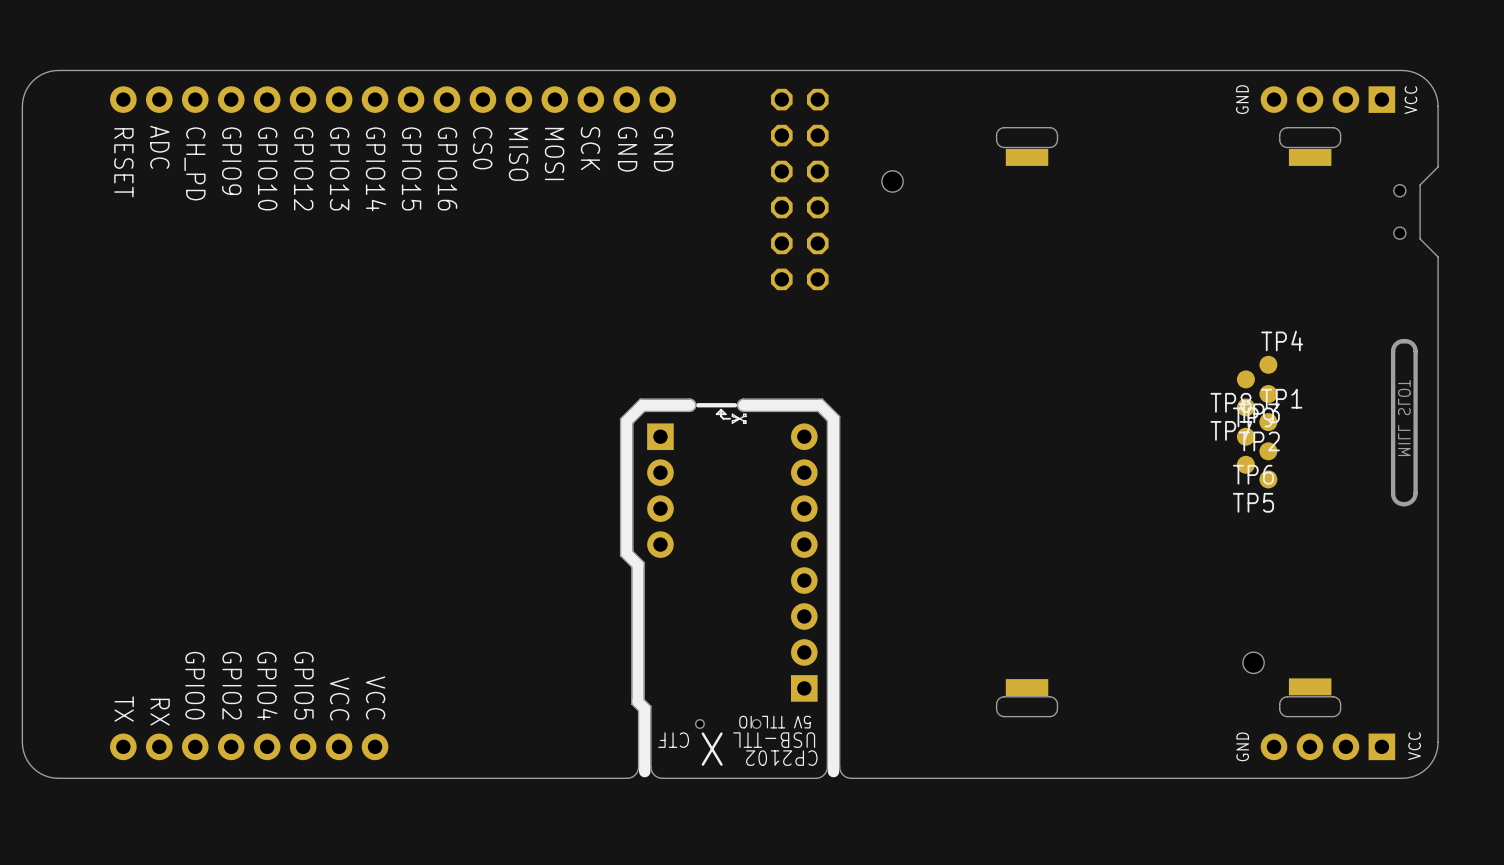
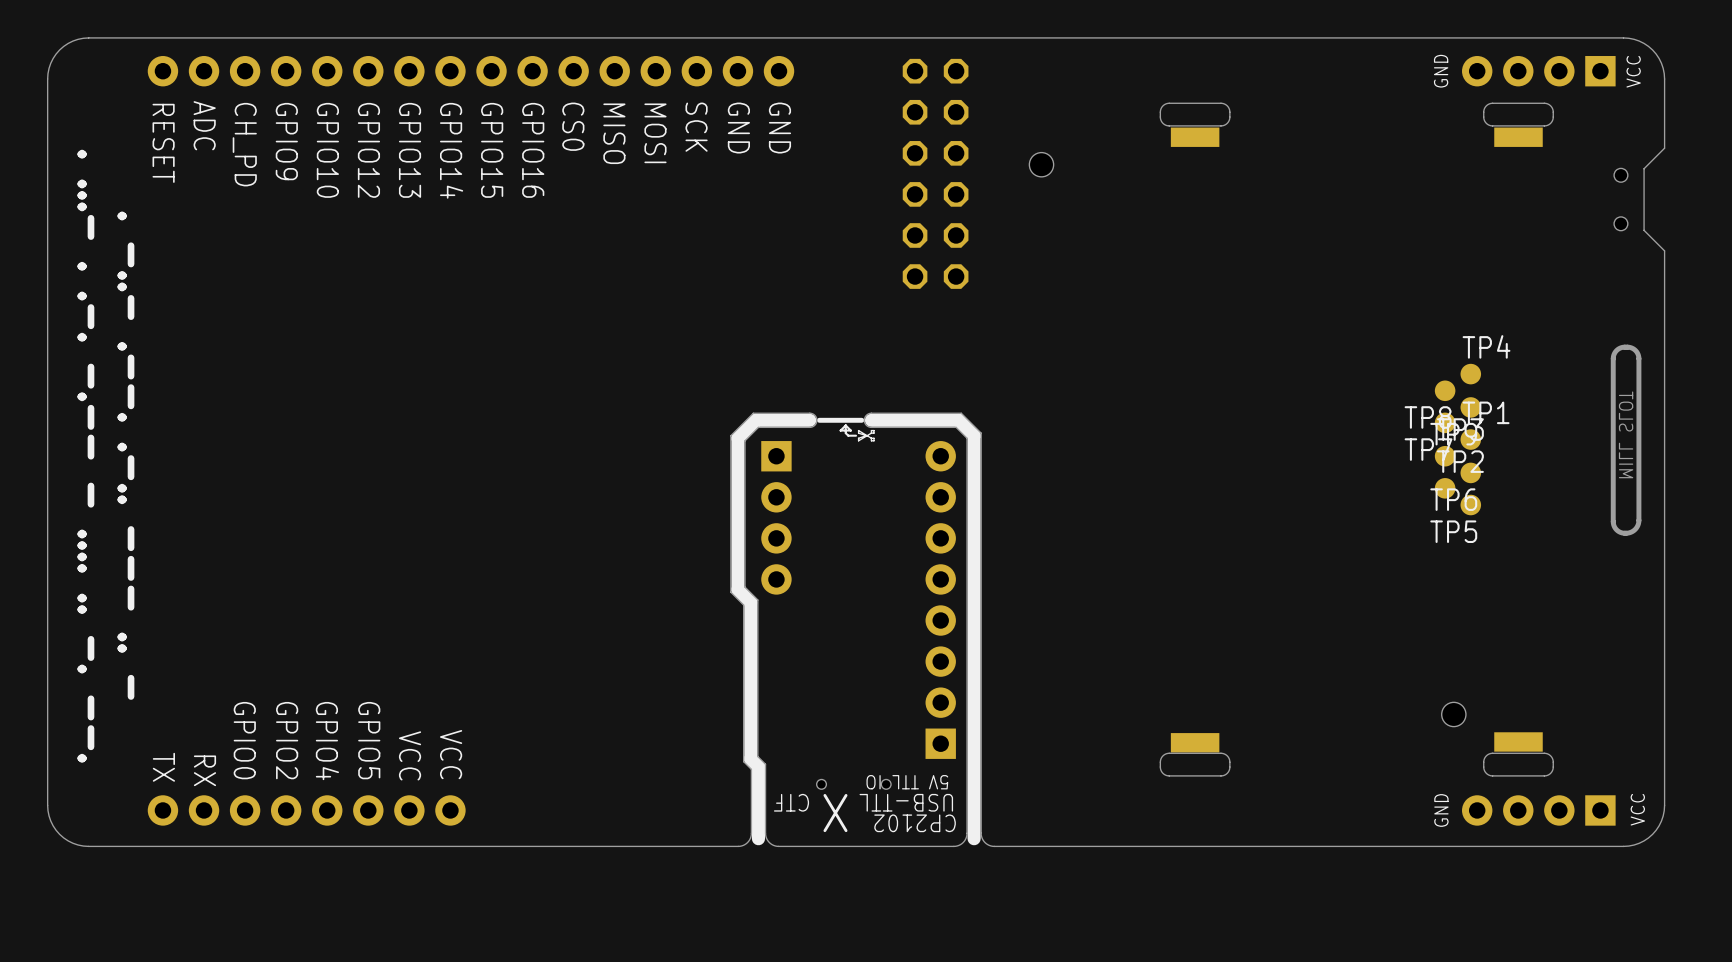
text: none -> . ...- . .-. -.-- - .... .. -. --. (85, 456)
text: none -> . -..- .--. .-.. --- .. - (125, 455)

